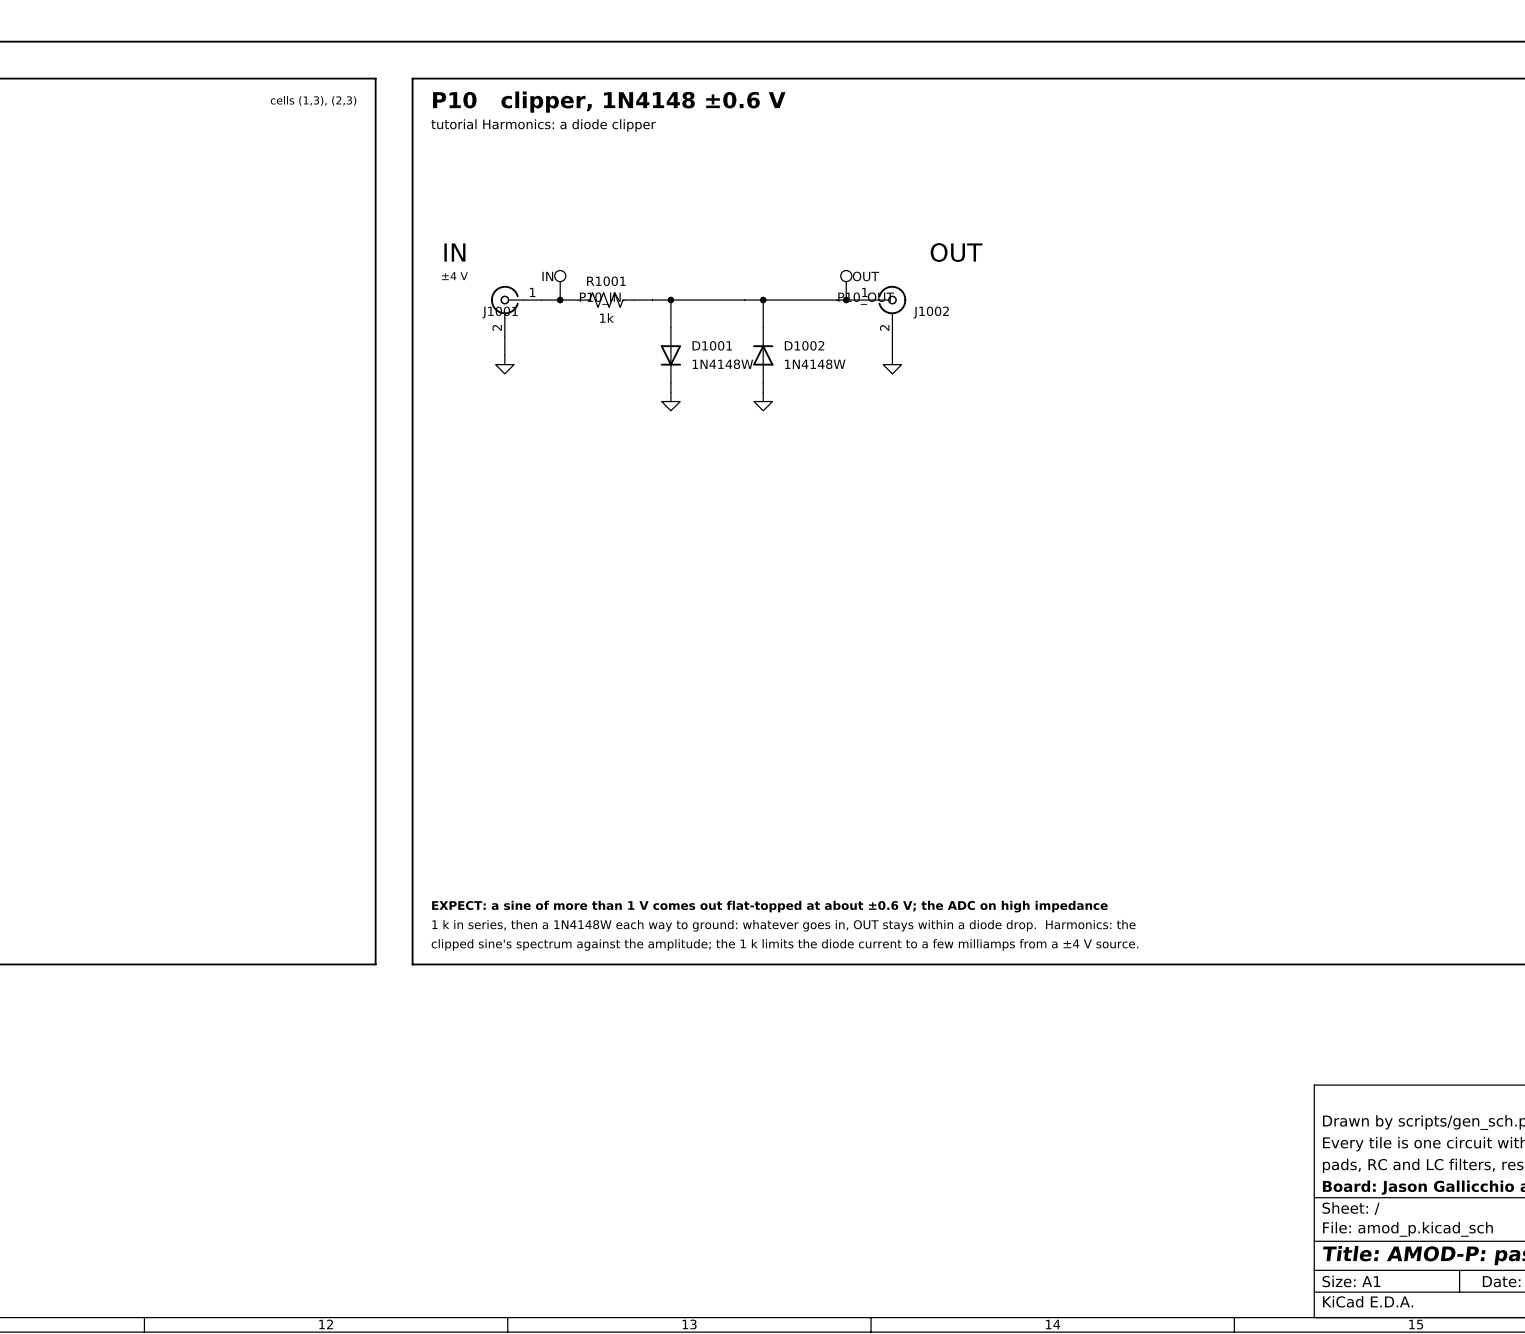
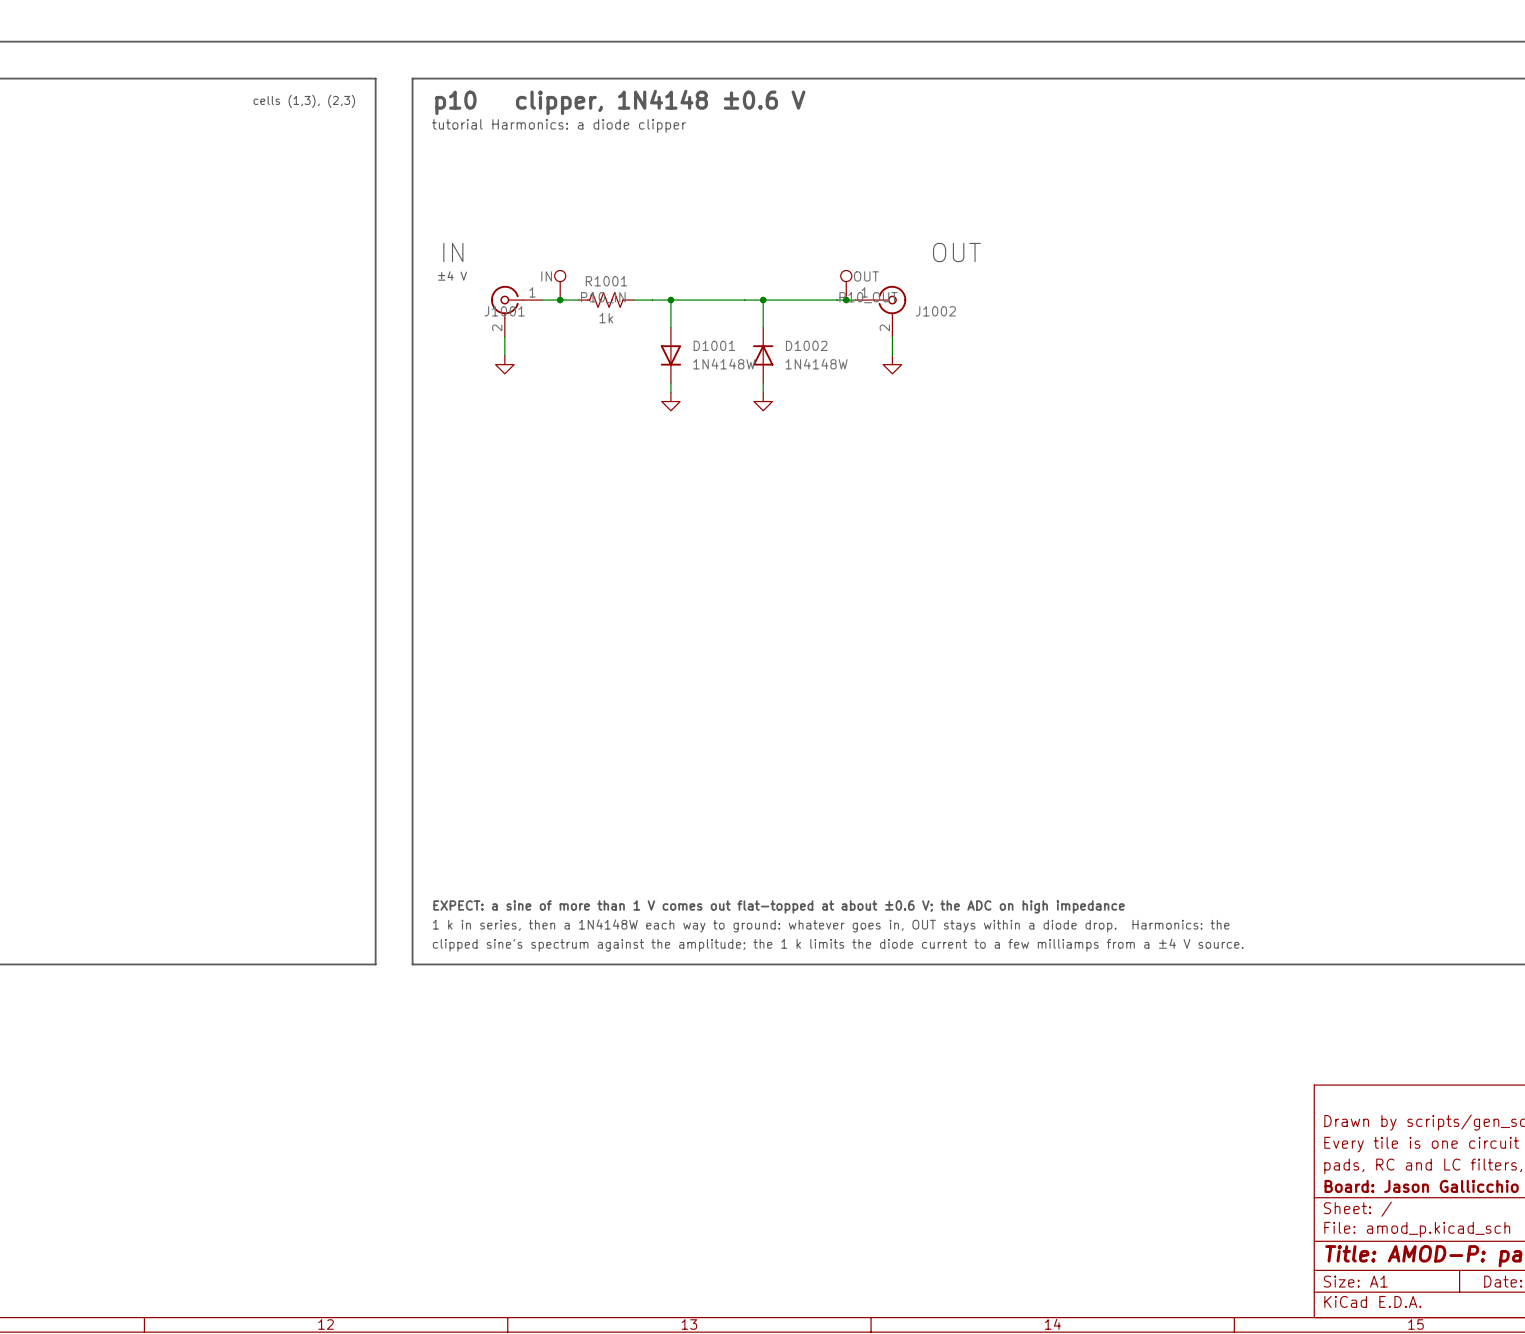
text: P10 clipper, 1N4148 ±0.6 V (609, 102) -> p10 clipper, 1N4148 ±0.6 V (620, 102)

